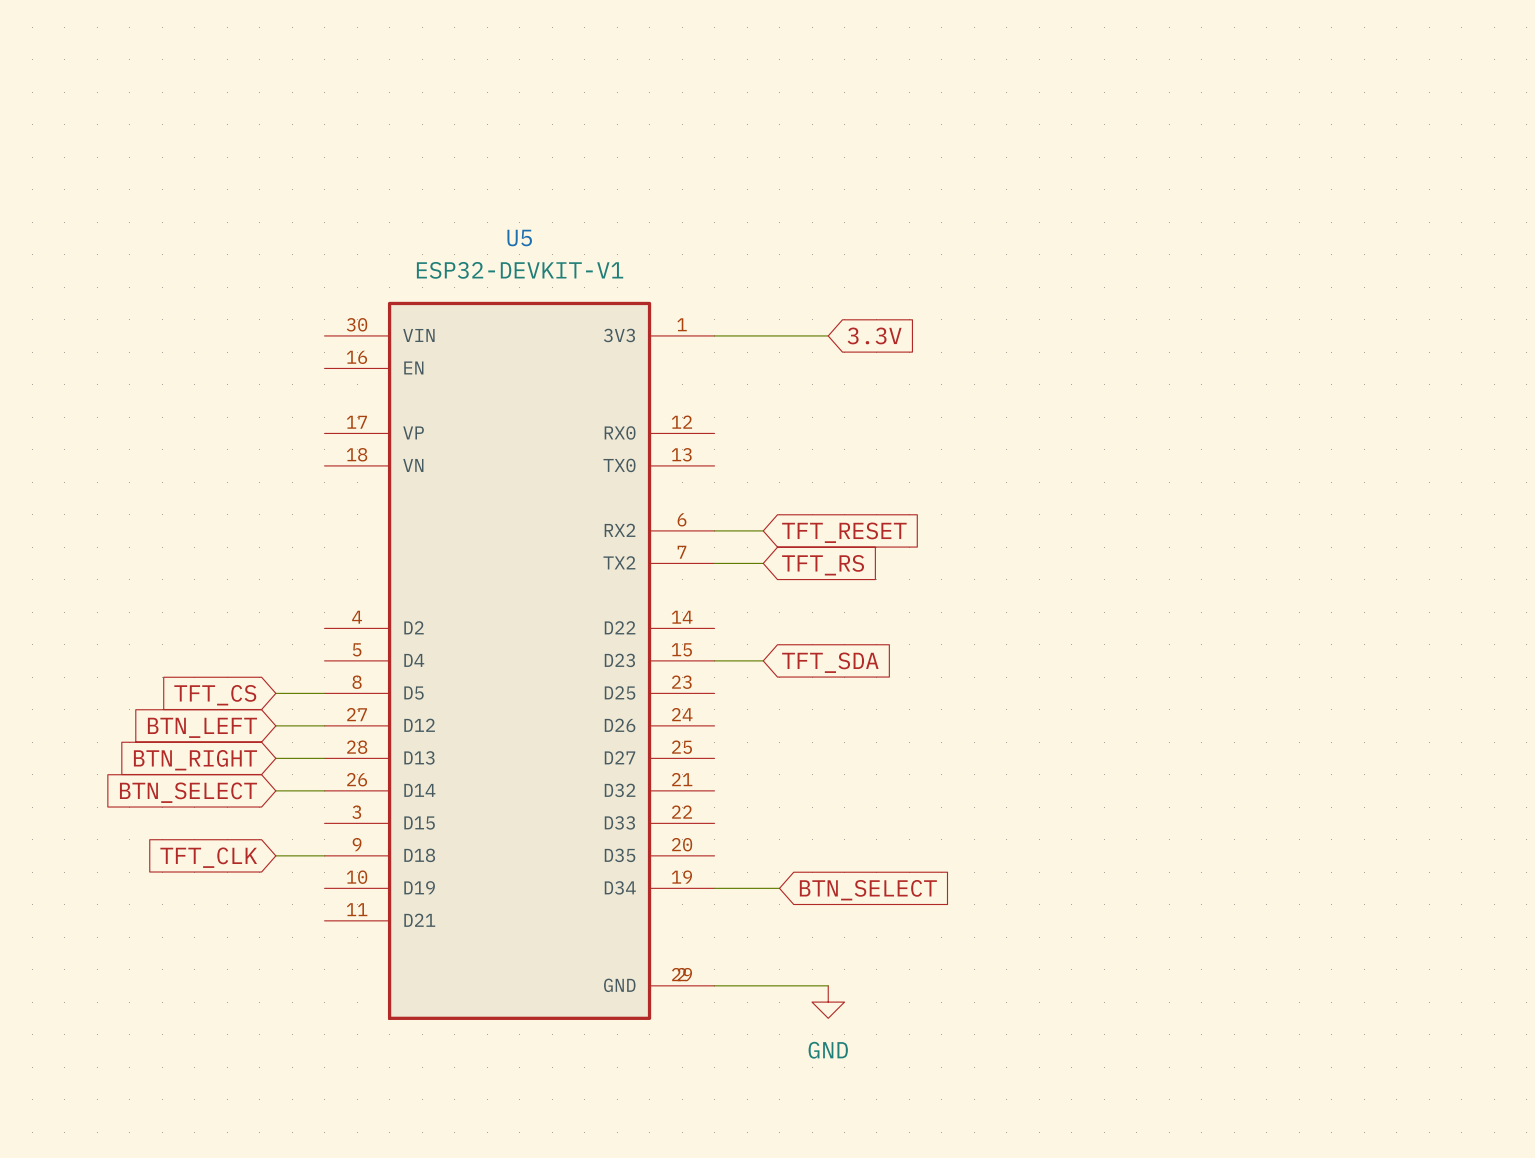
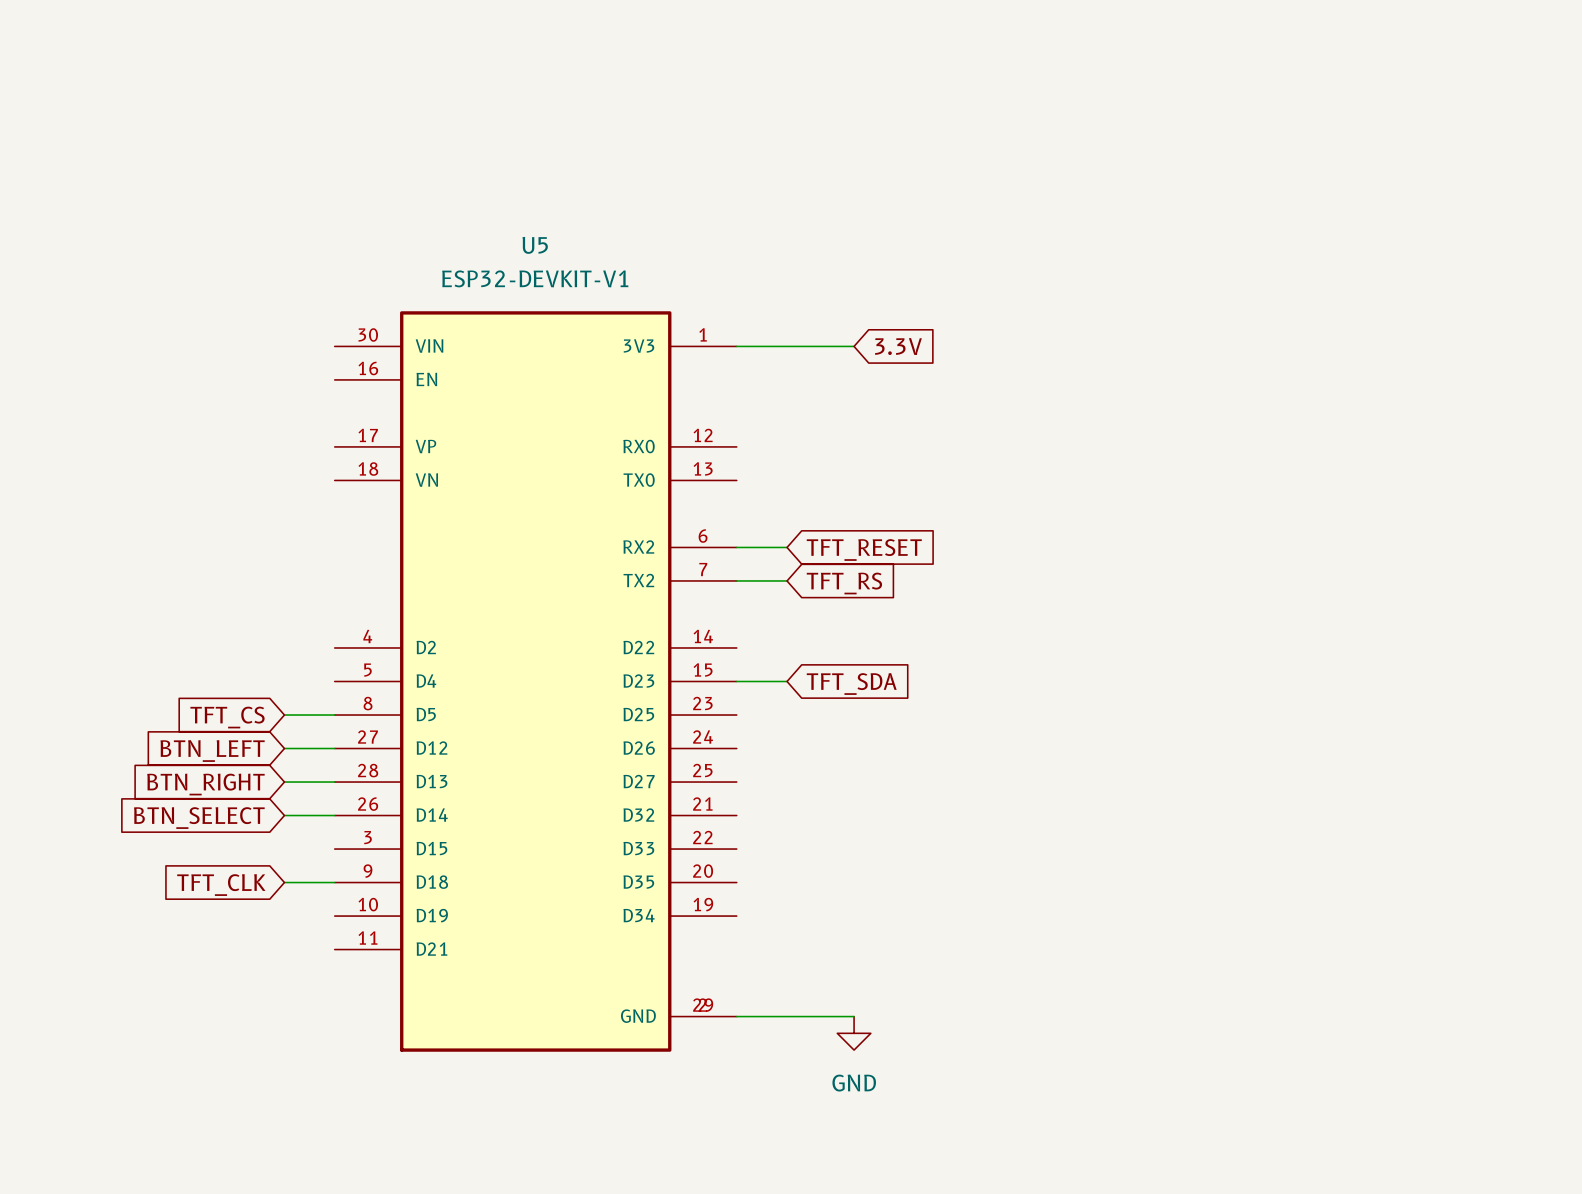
wire: (714, 888) (779, 888) -> none
global label: BTN_SELECT (868, 890) -> none

